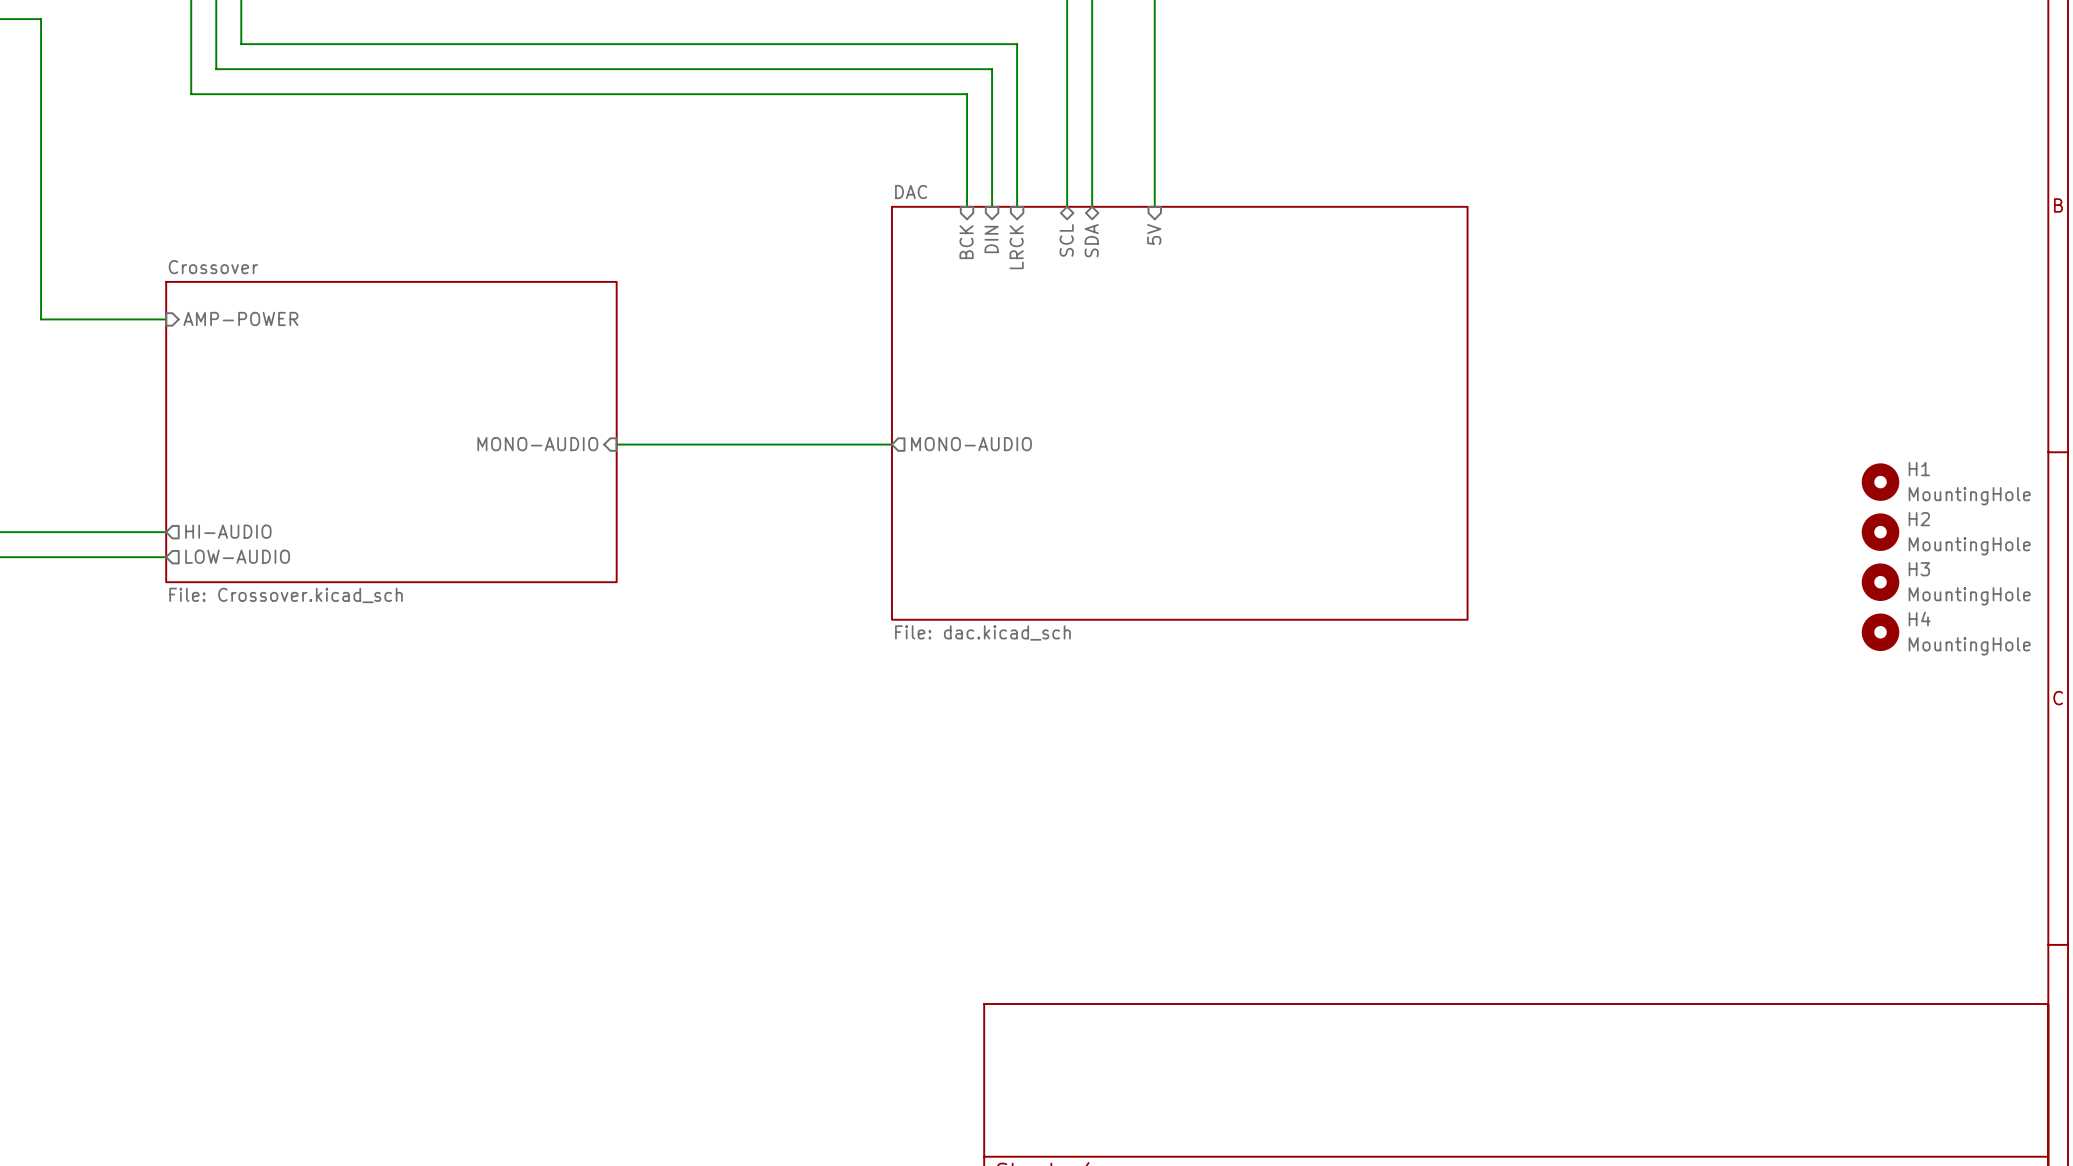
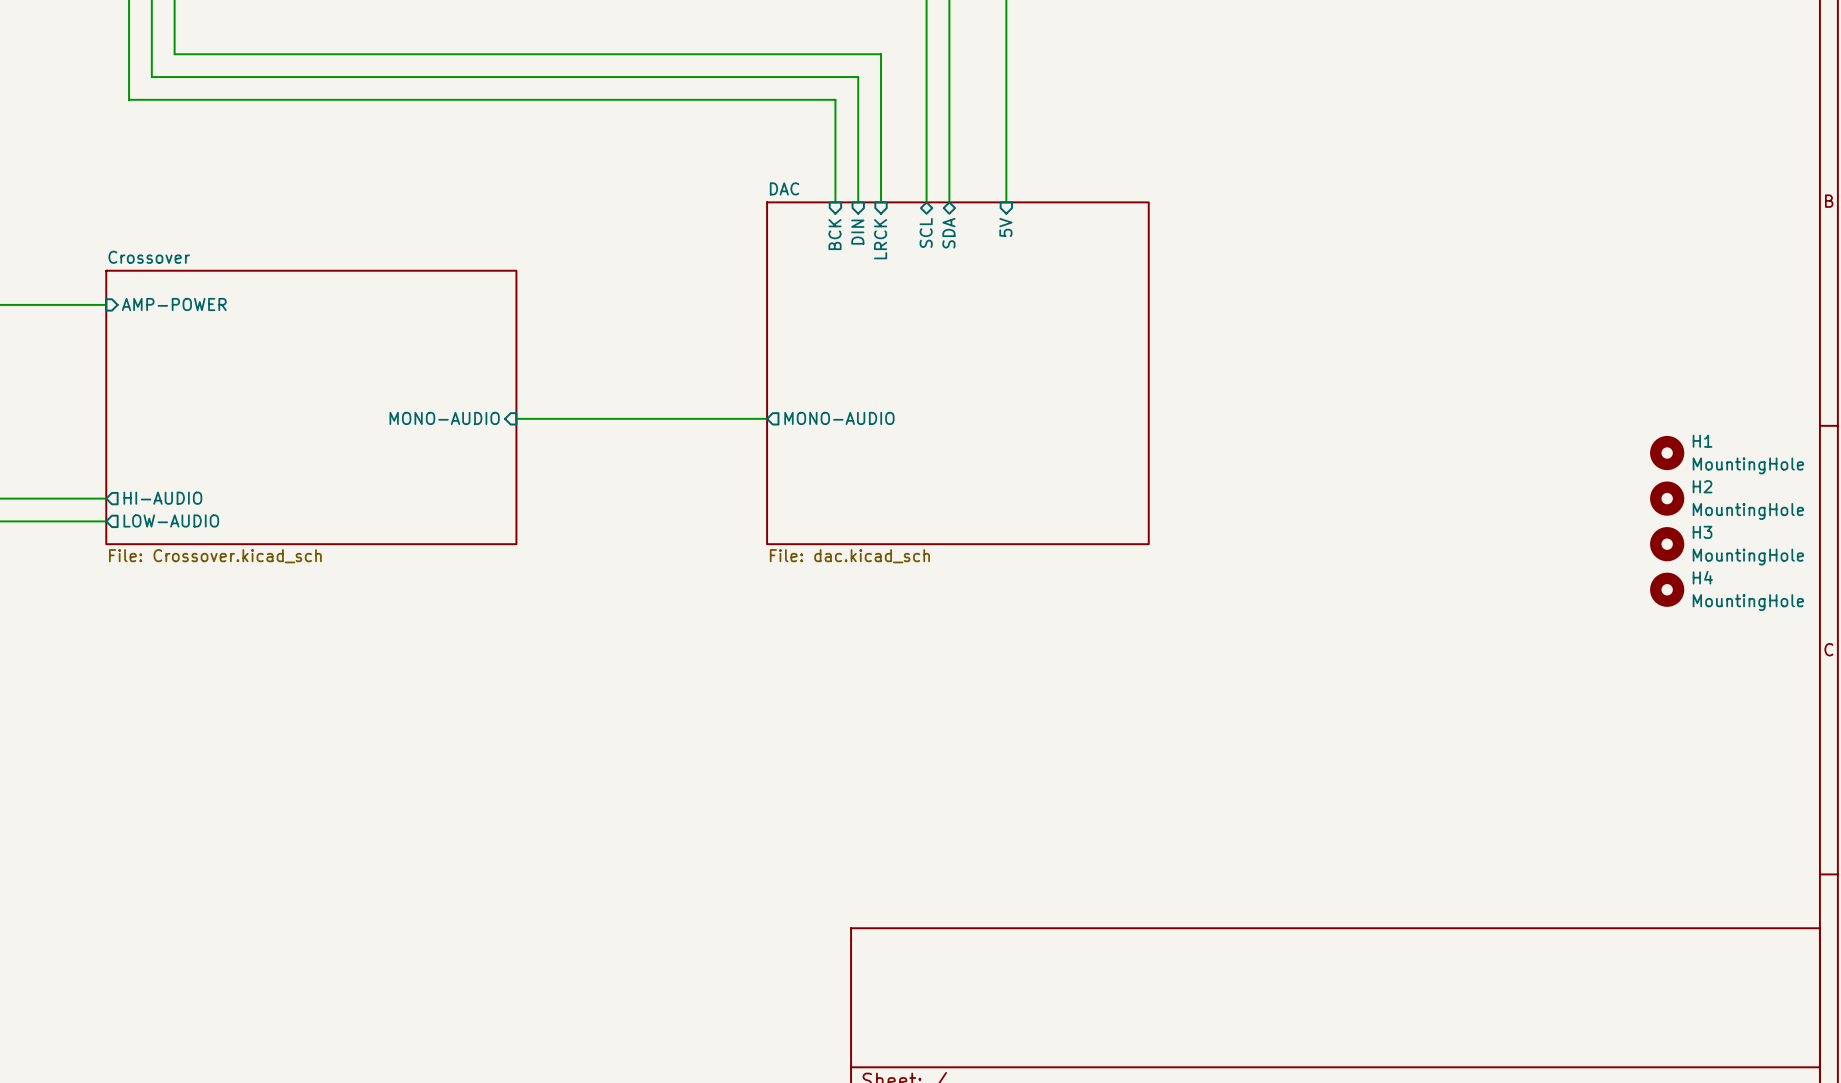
sheet DAC: none -> File: dac.kicad_sch (957, 373)
sheet DAC: File: dac.kicad_sch (1179, 413) -> none

